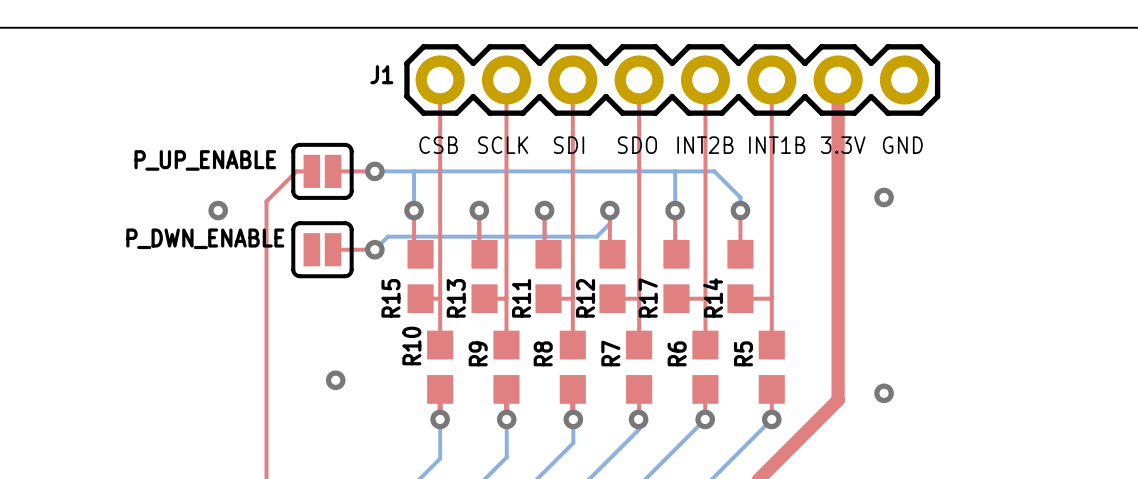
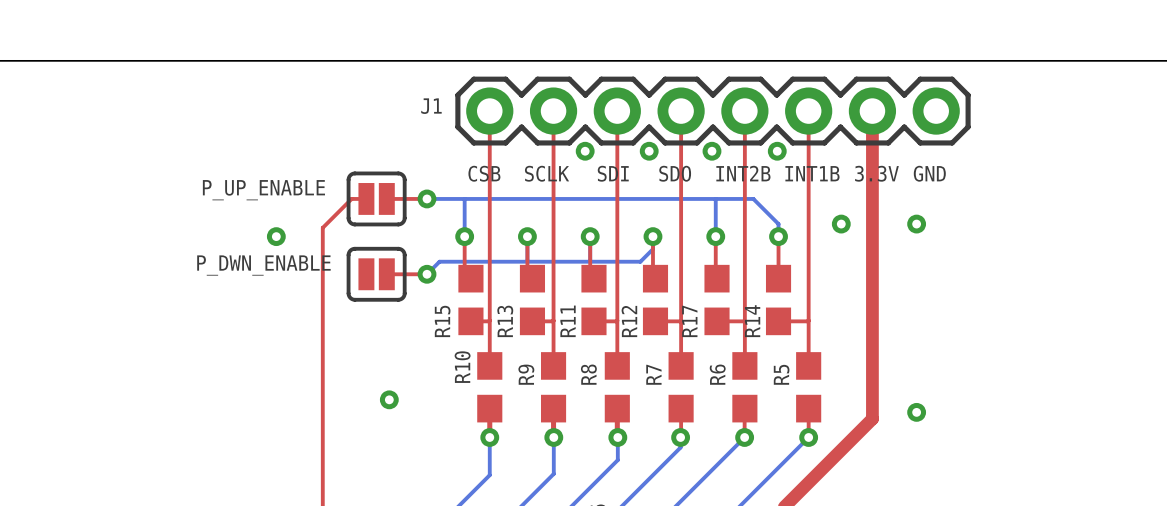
via: none -> (585, 151)
via: none -> (649, 151)
via: none -> (711, 151)
via: none -> (777, 151)
via: none -> (841, 224)

